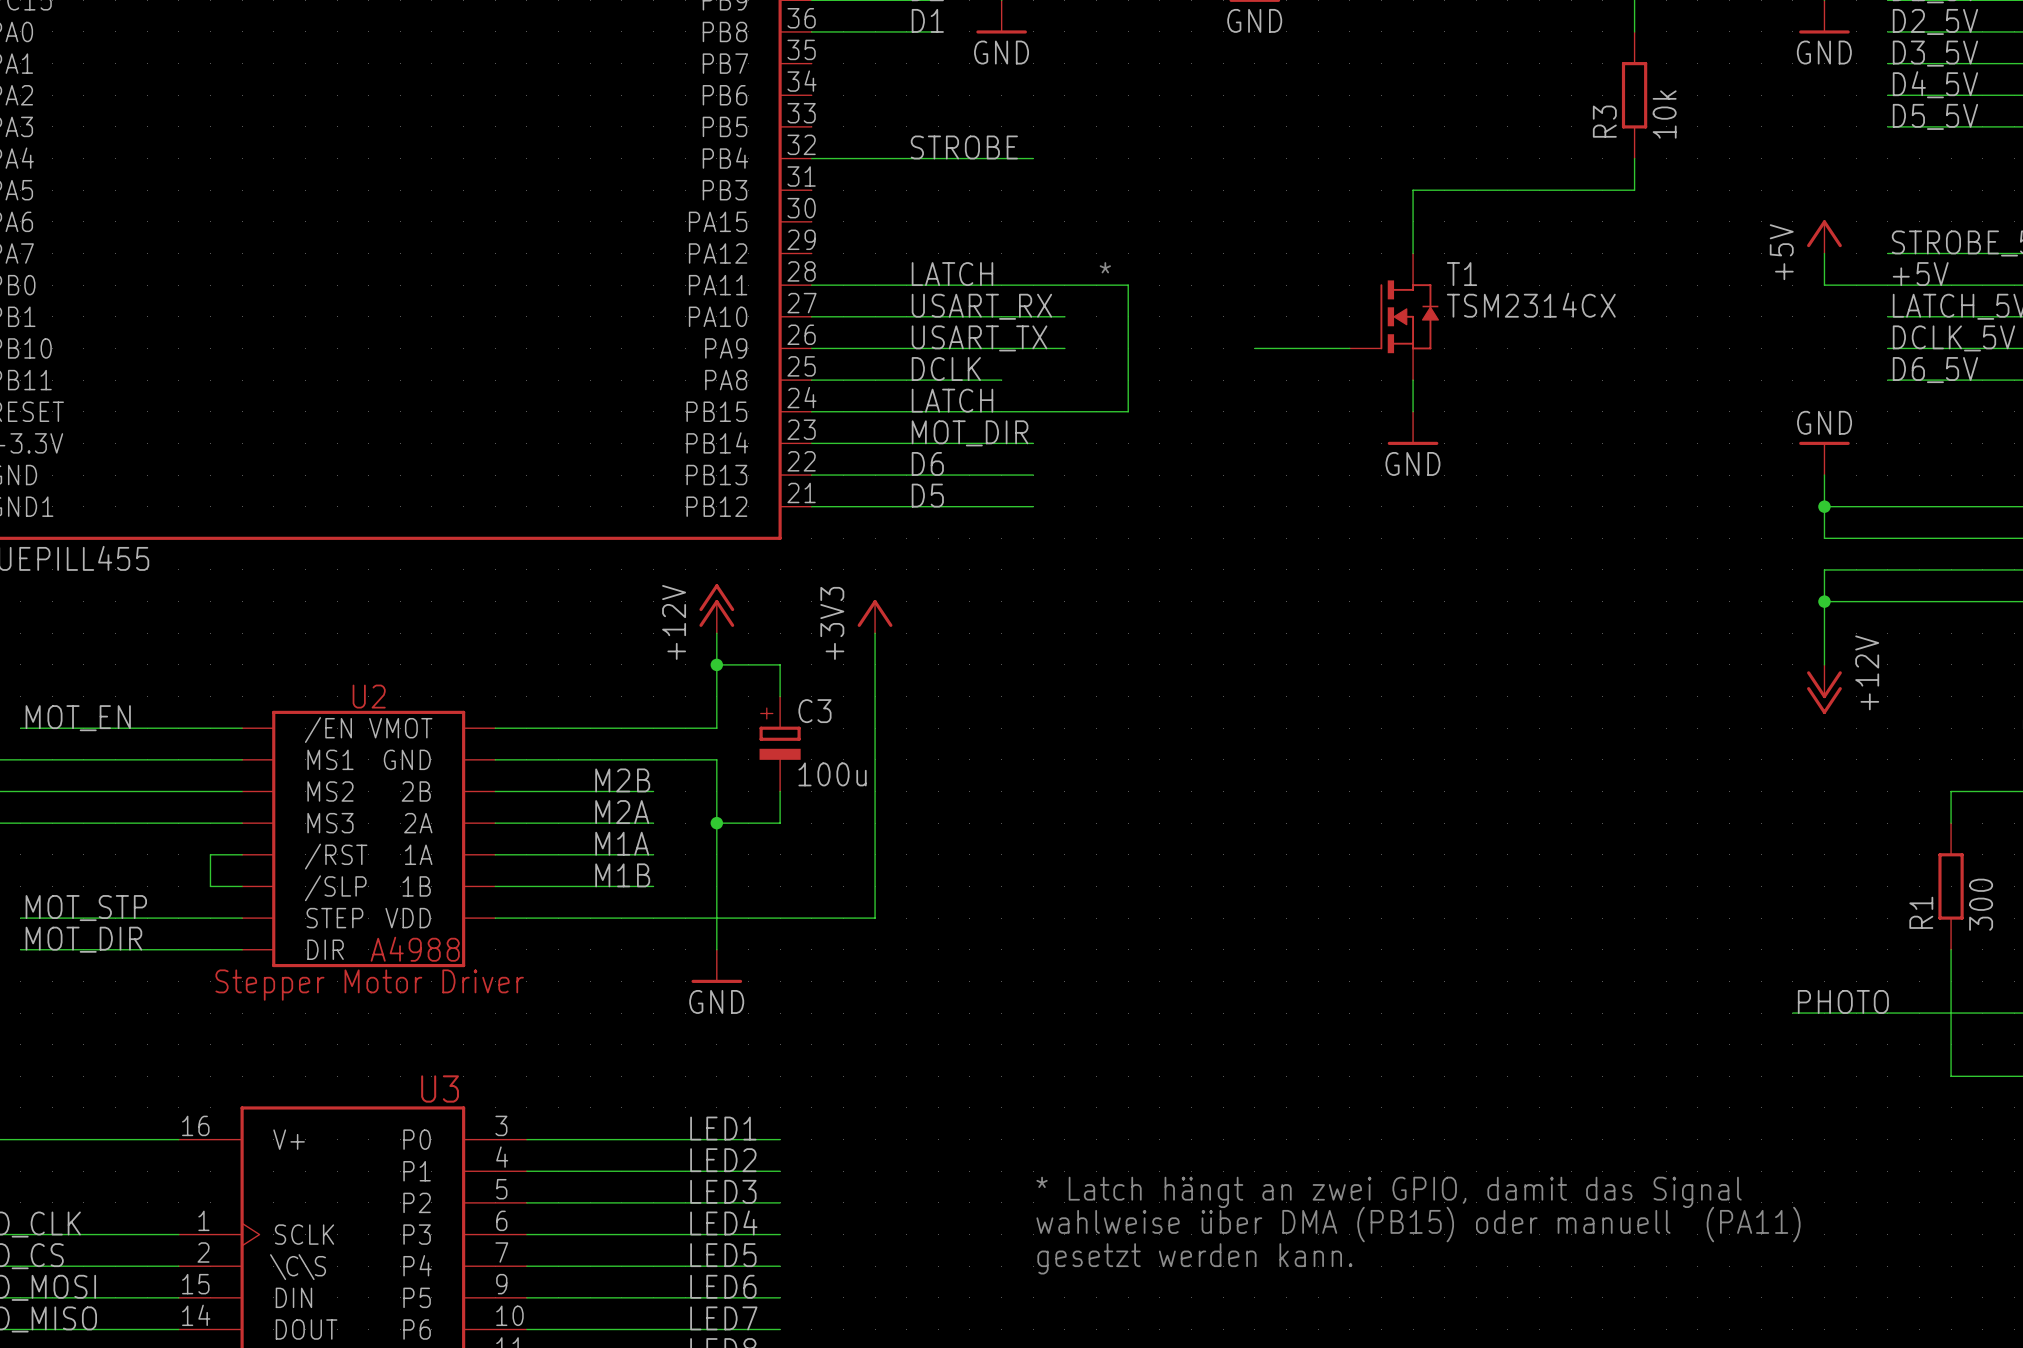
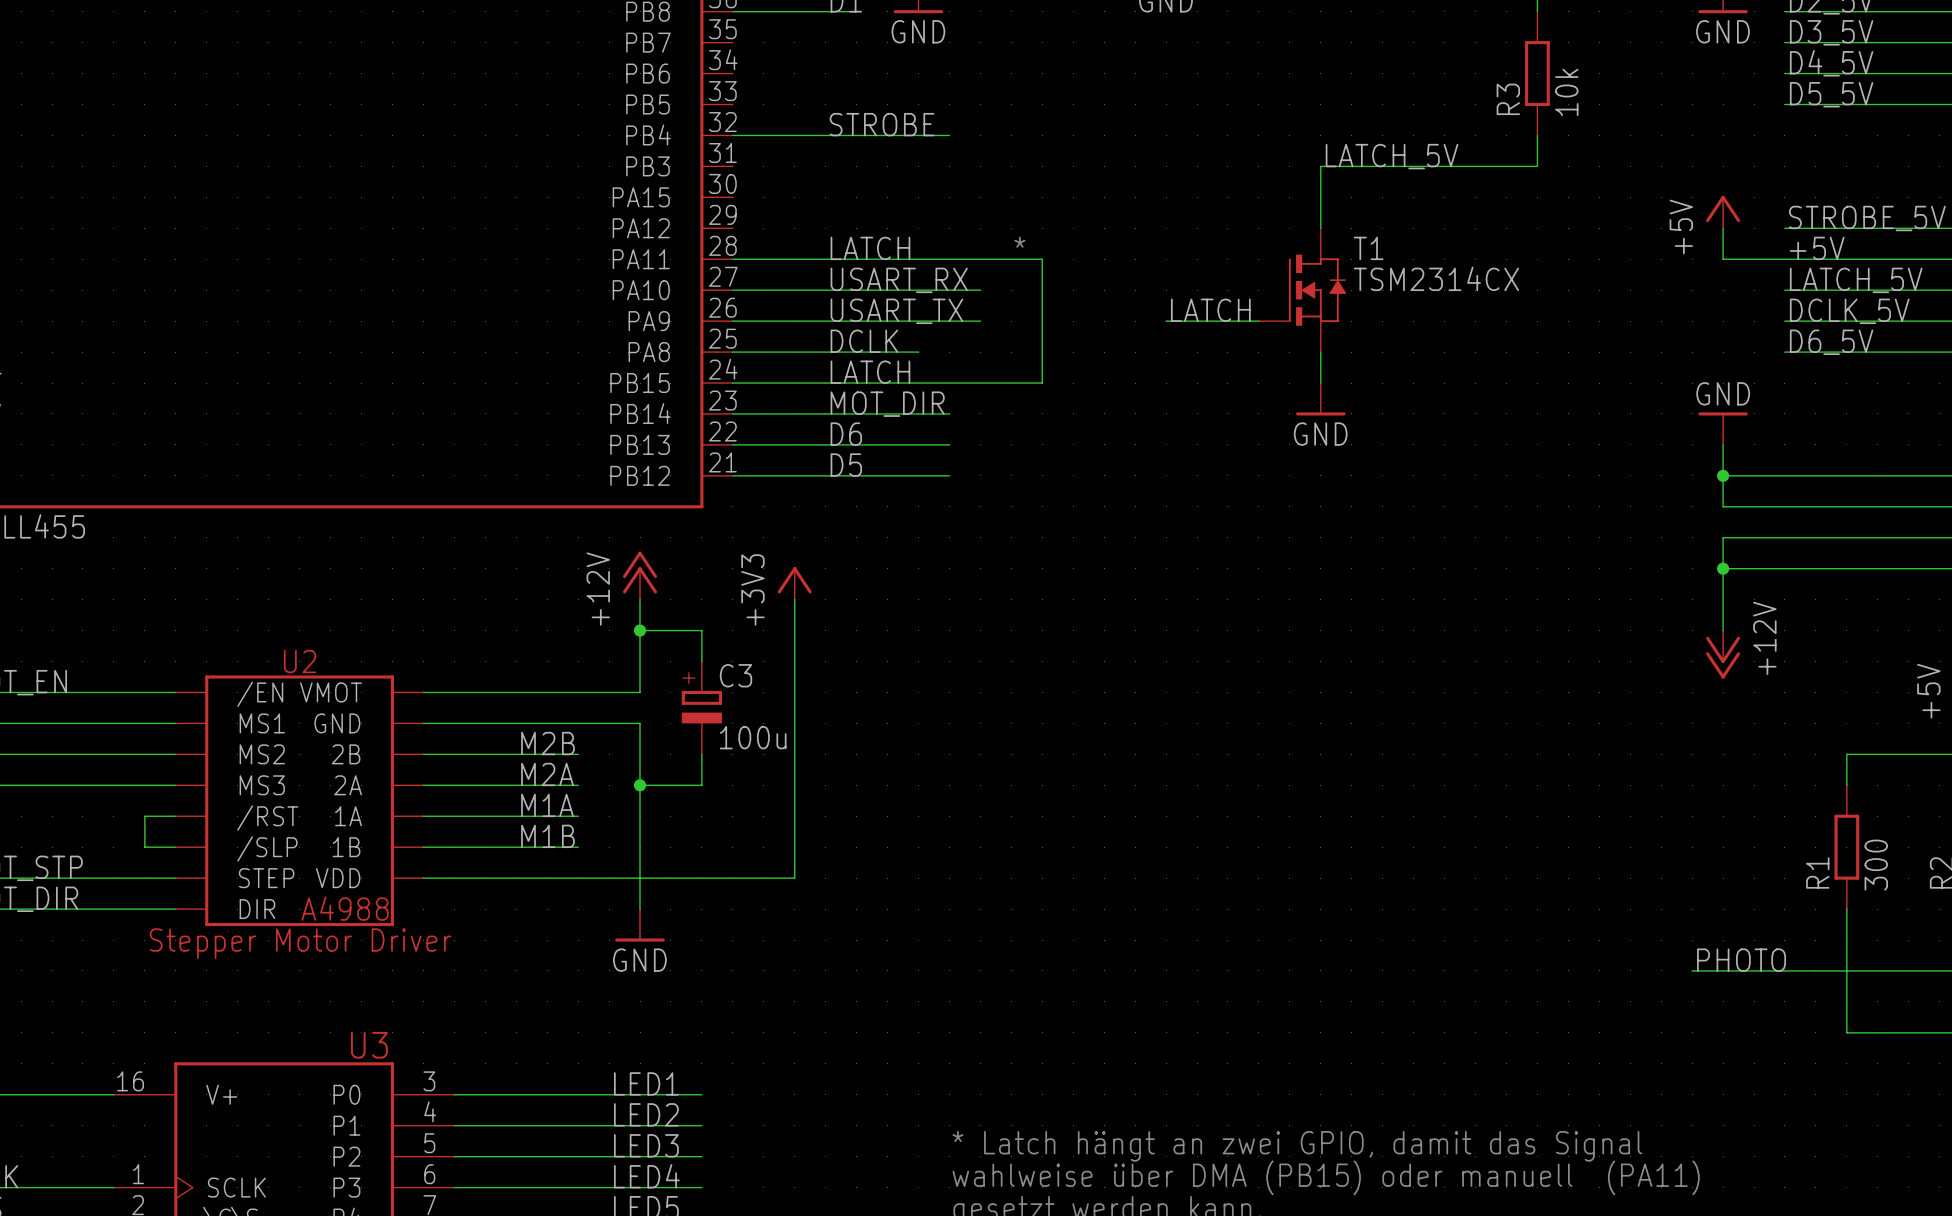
label: none -> LATCH_5V (1392, 156)
label: none -> LATCH (1210, 310)

